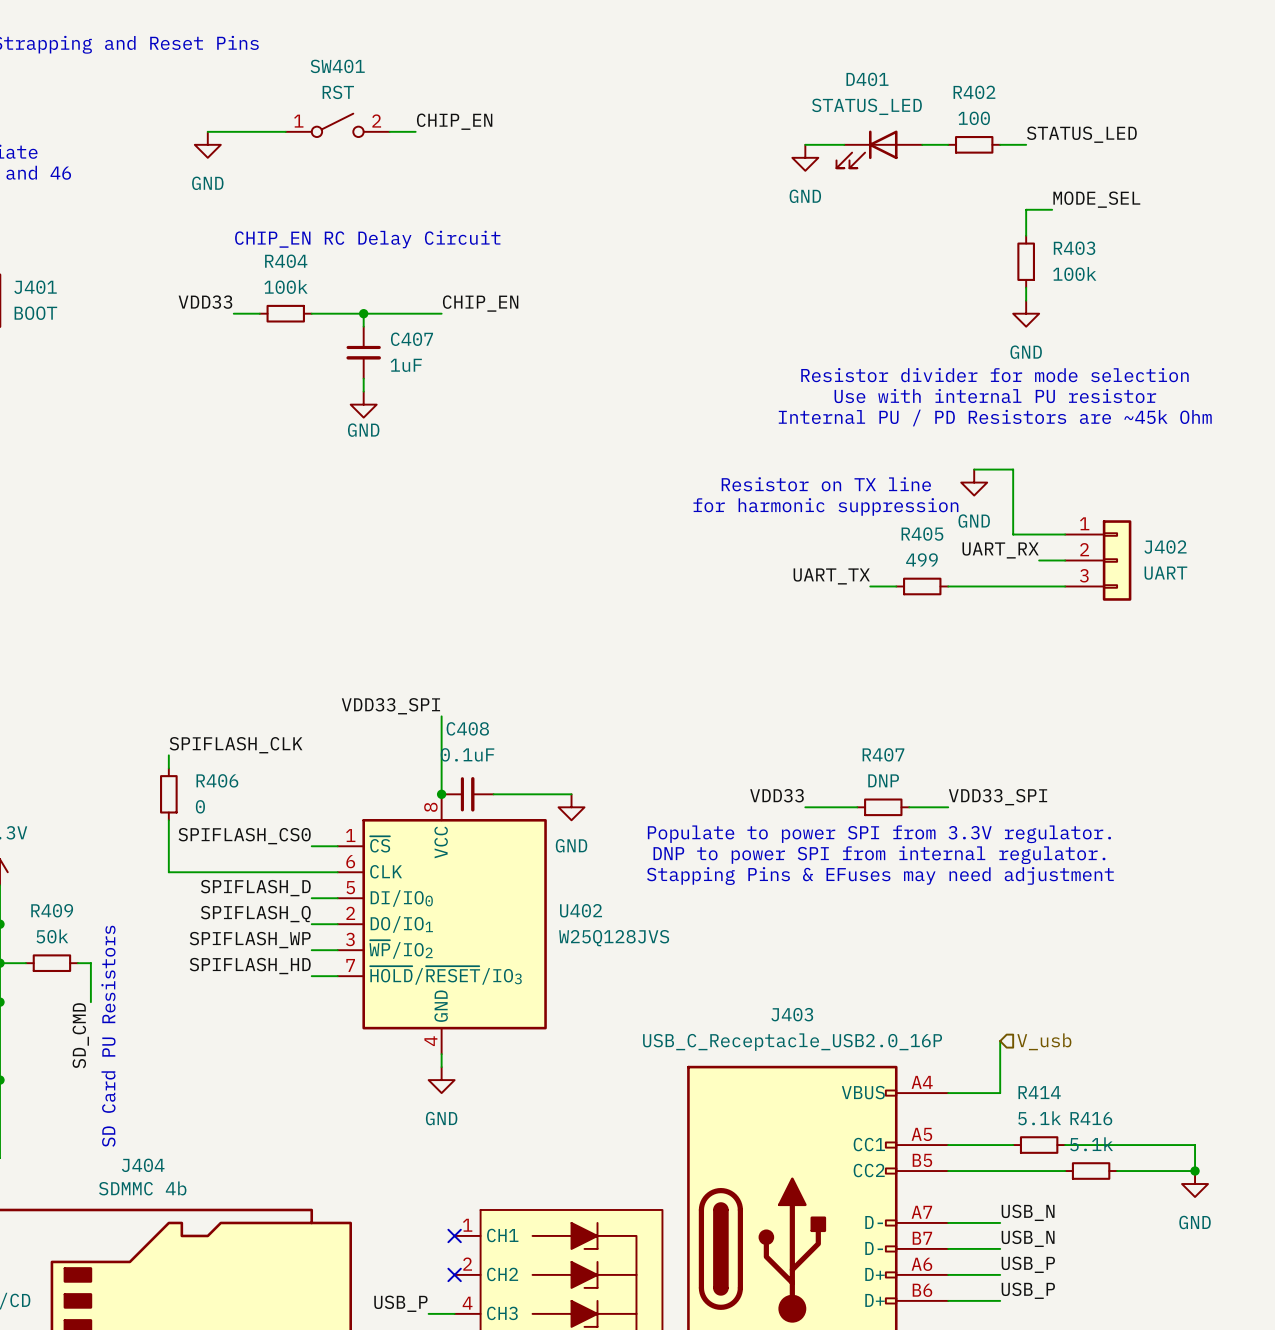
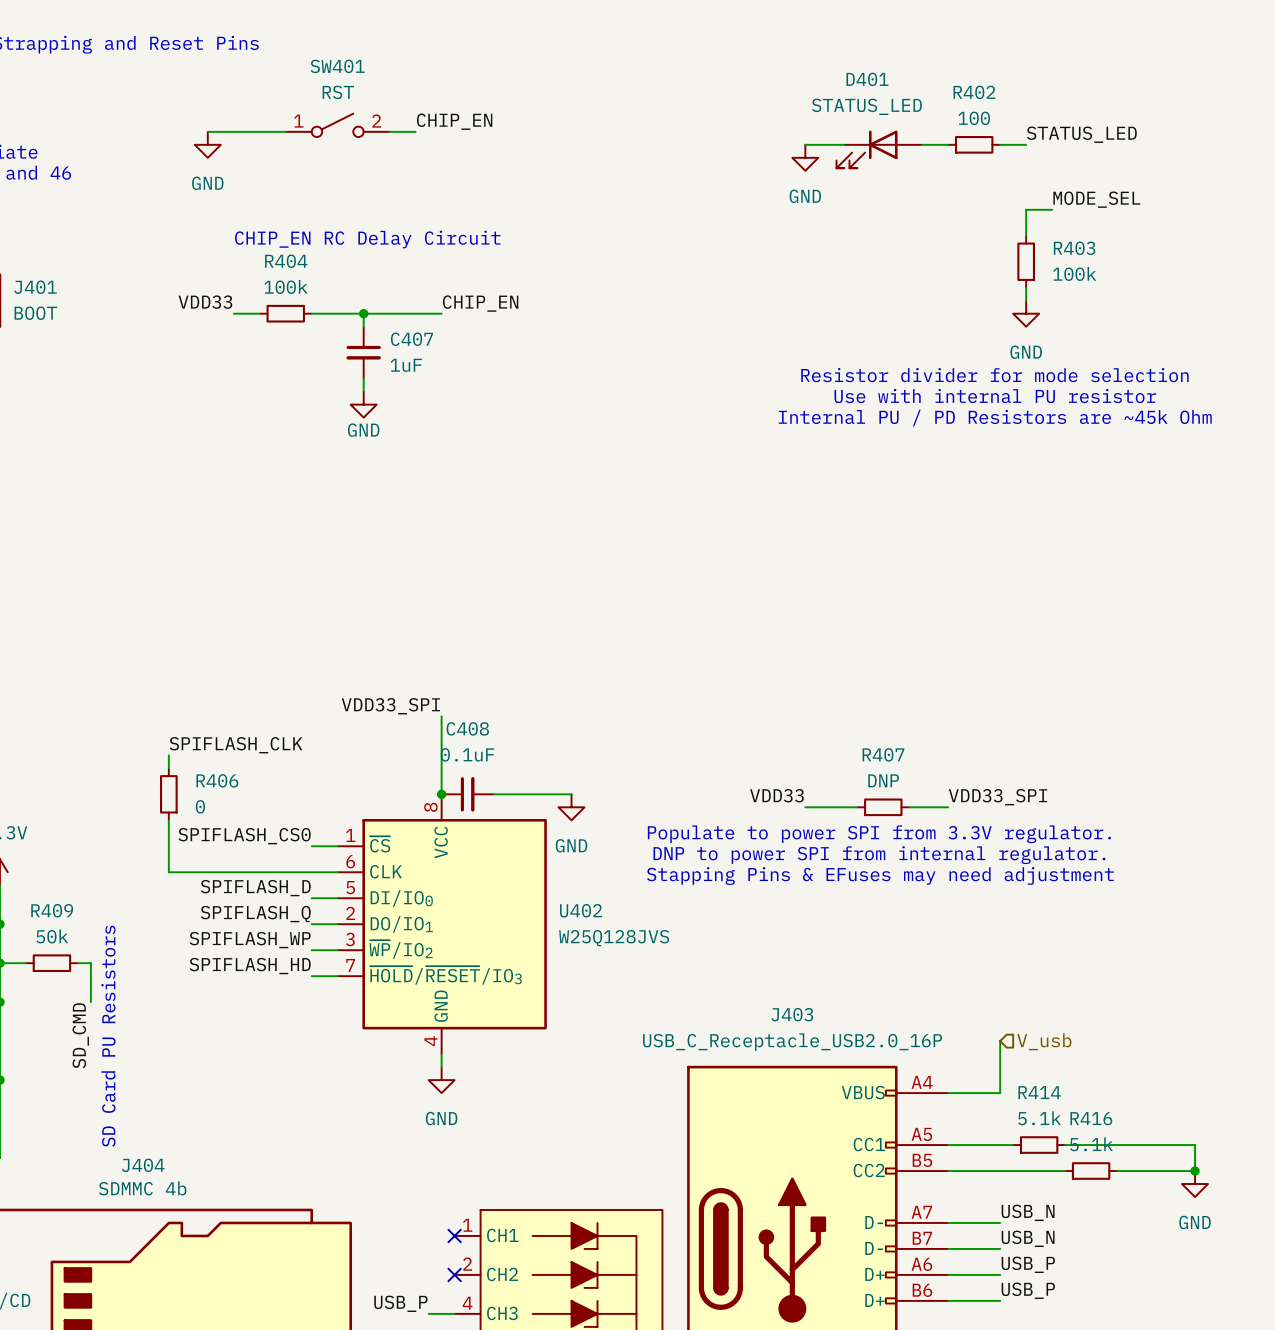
wire: (974, 469) (1013, 469) (1013, 534) (1065, 534) -> none
power symbol: GND (974, 482) -> none
text: Resistor on TX line (826, 484) -> none
text: for harmonic suppression (825, 506) -> none
label: UART_RX (1000, 550) -> none
wire: (1039, 560) (1065, 560) -> none
J402: UART (1098, 560) -> none
label: UART_TX (831, 576) -> none
wire: (870, 586) (896, 586) -> none
R405: 499 (922, 586) -> none
wire: (948, 586) (1065, 586) -> none

